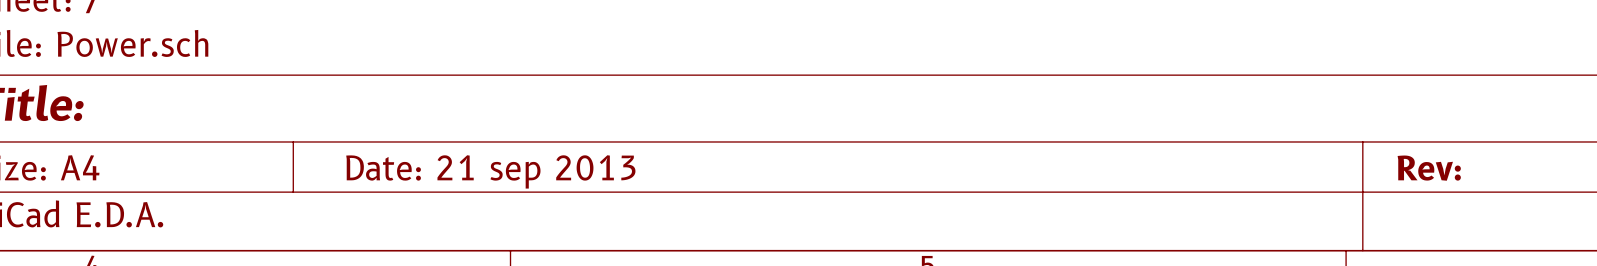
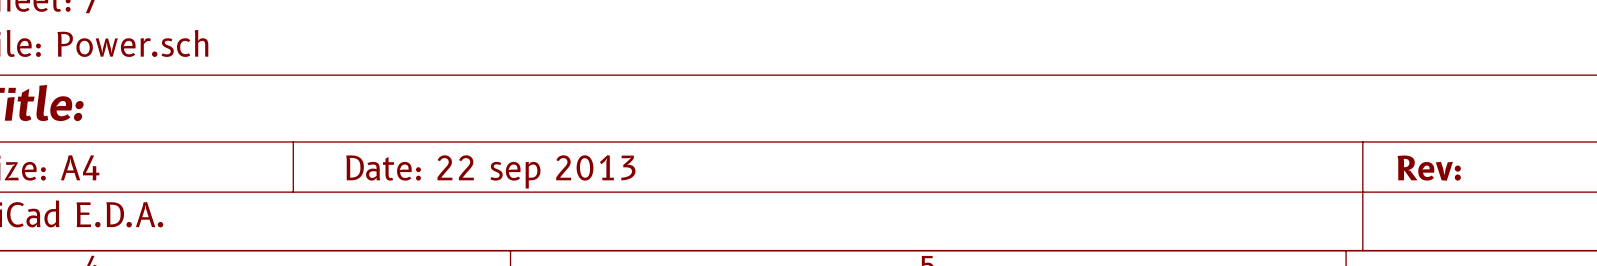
title block: Date: 21 sep 2013 (490, 171) -> Date: 22 sep 2013 (490, 171)

